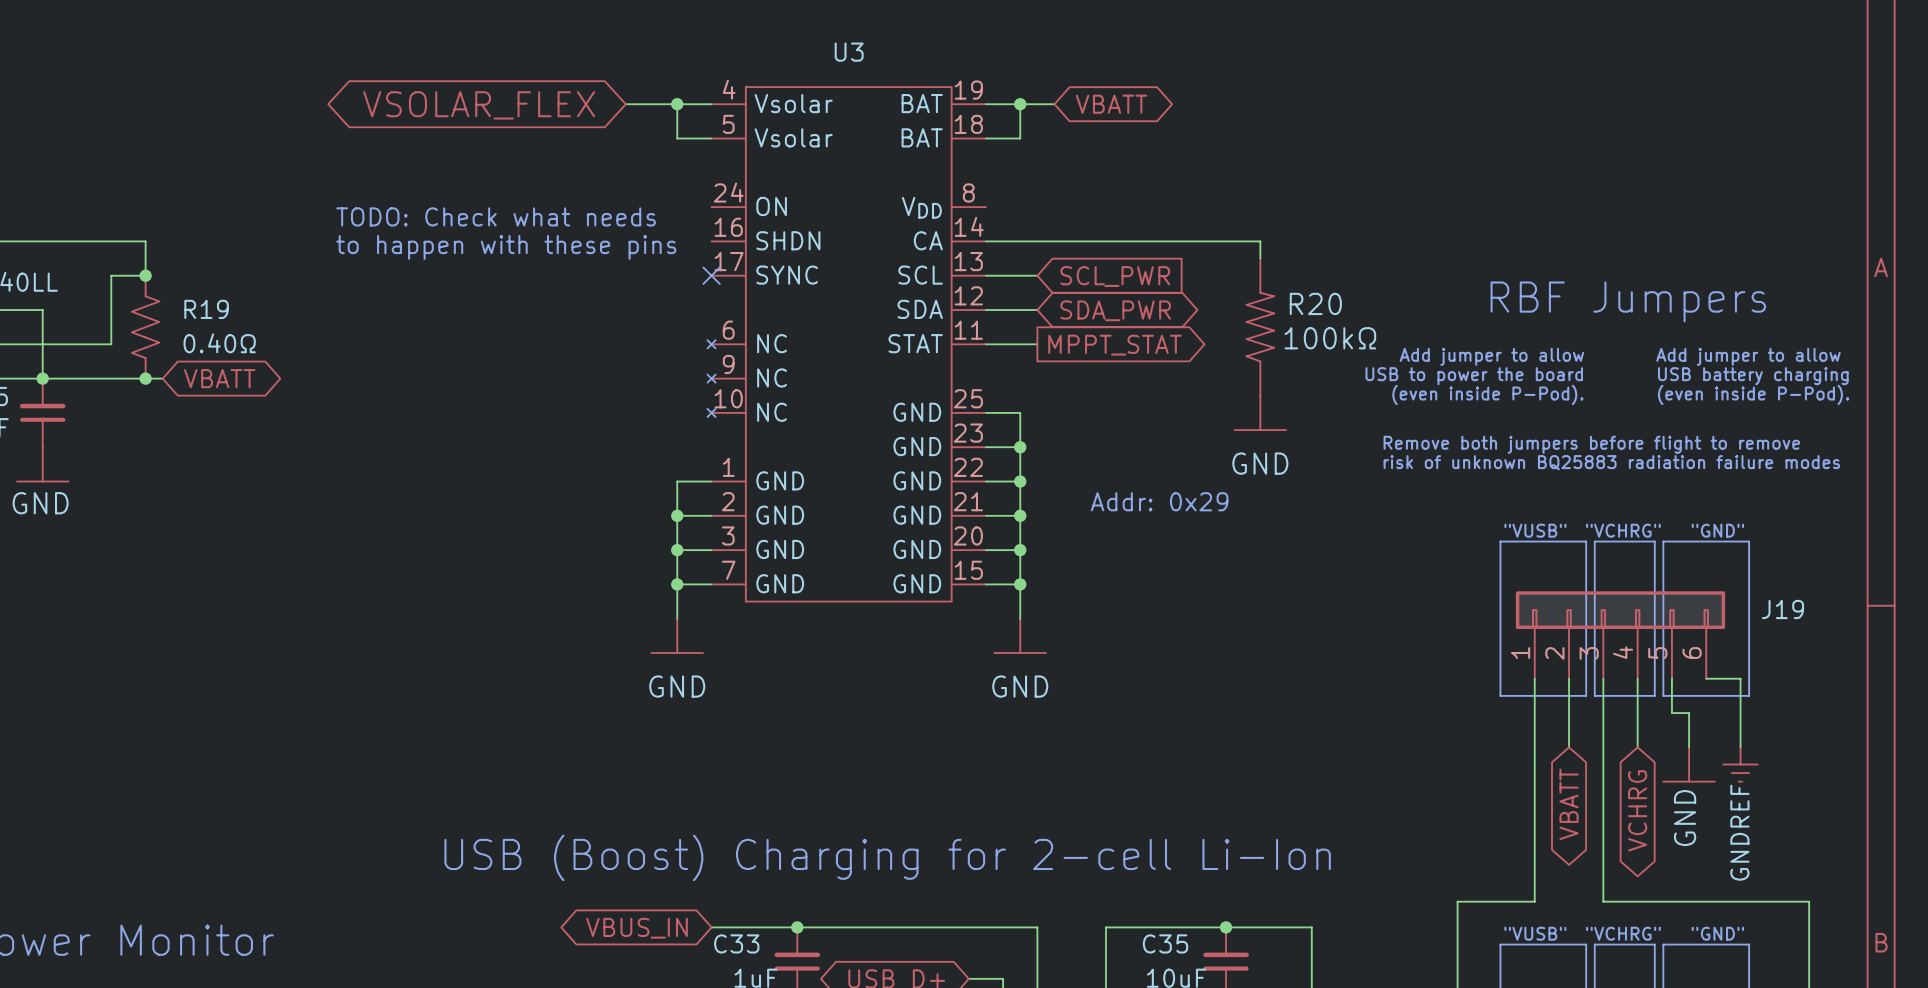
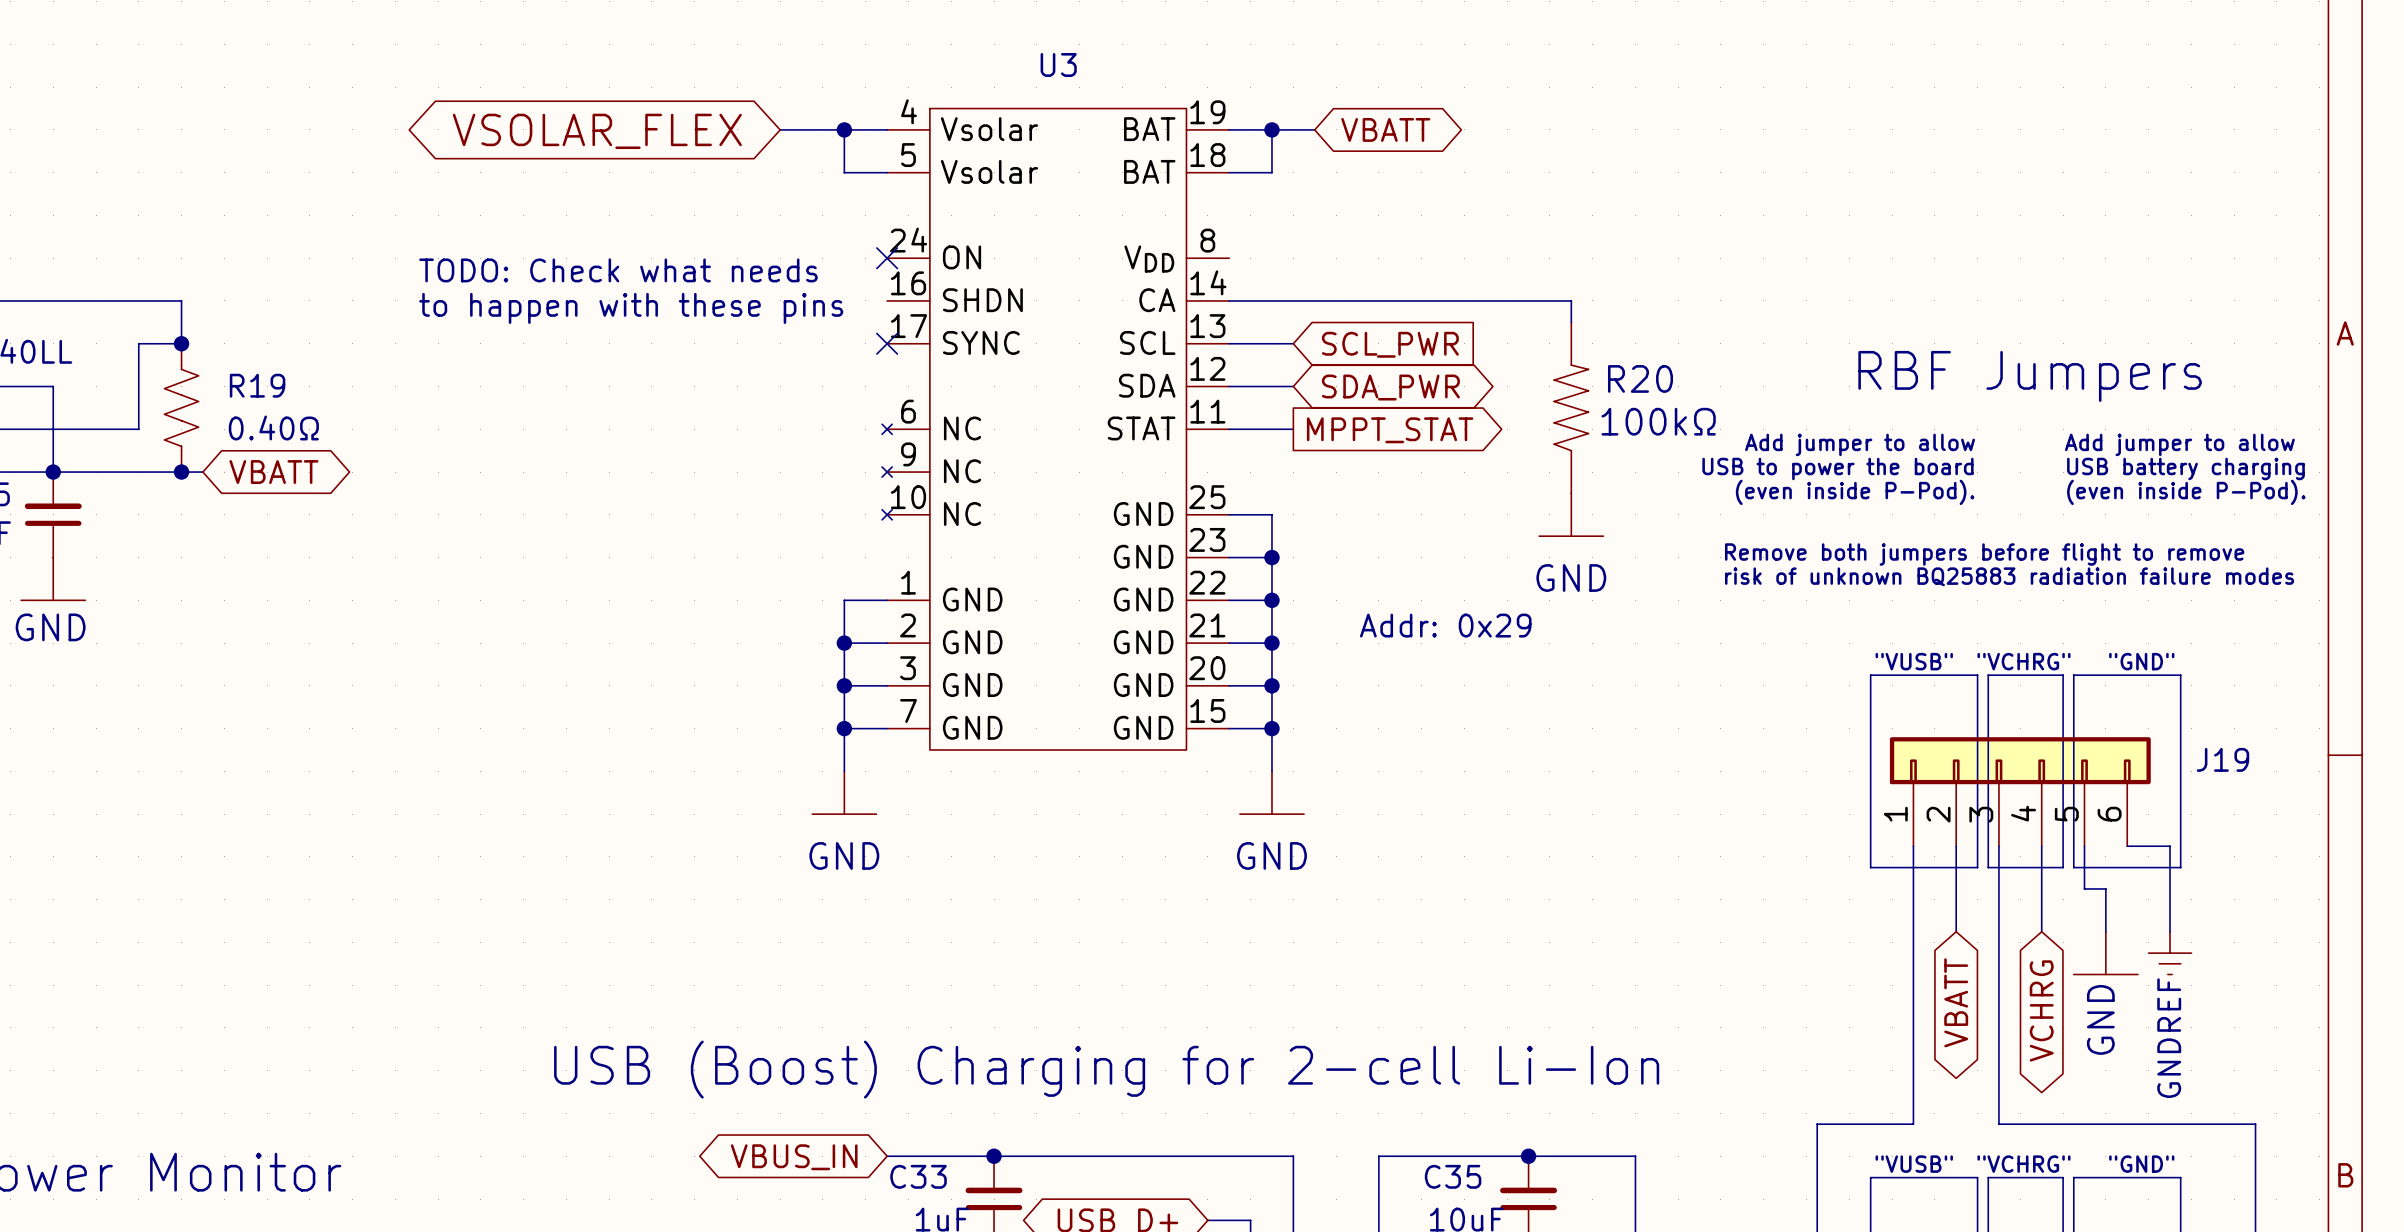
no-connect mark: none -> (887, 258)

